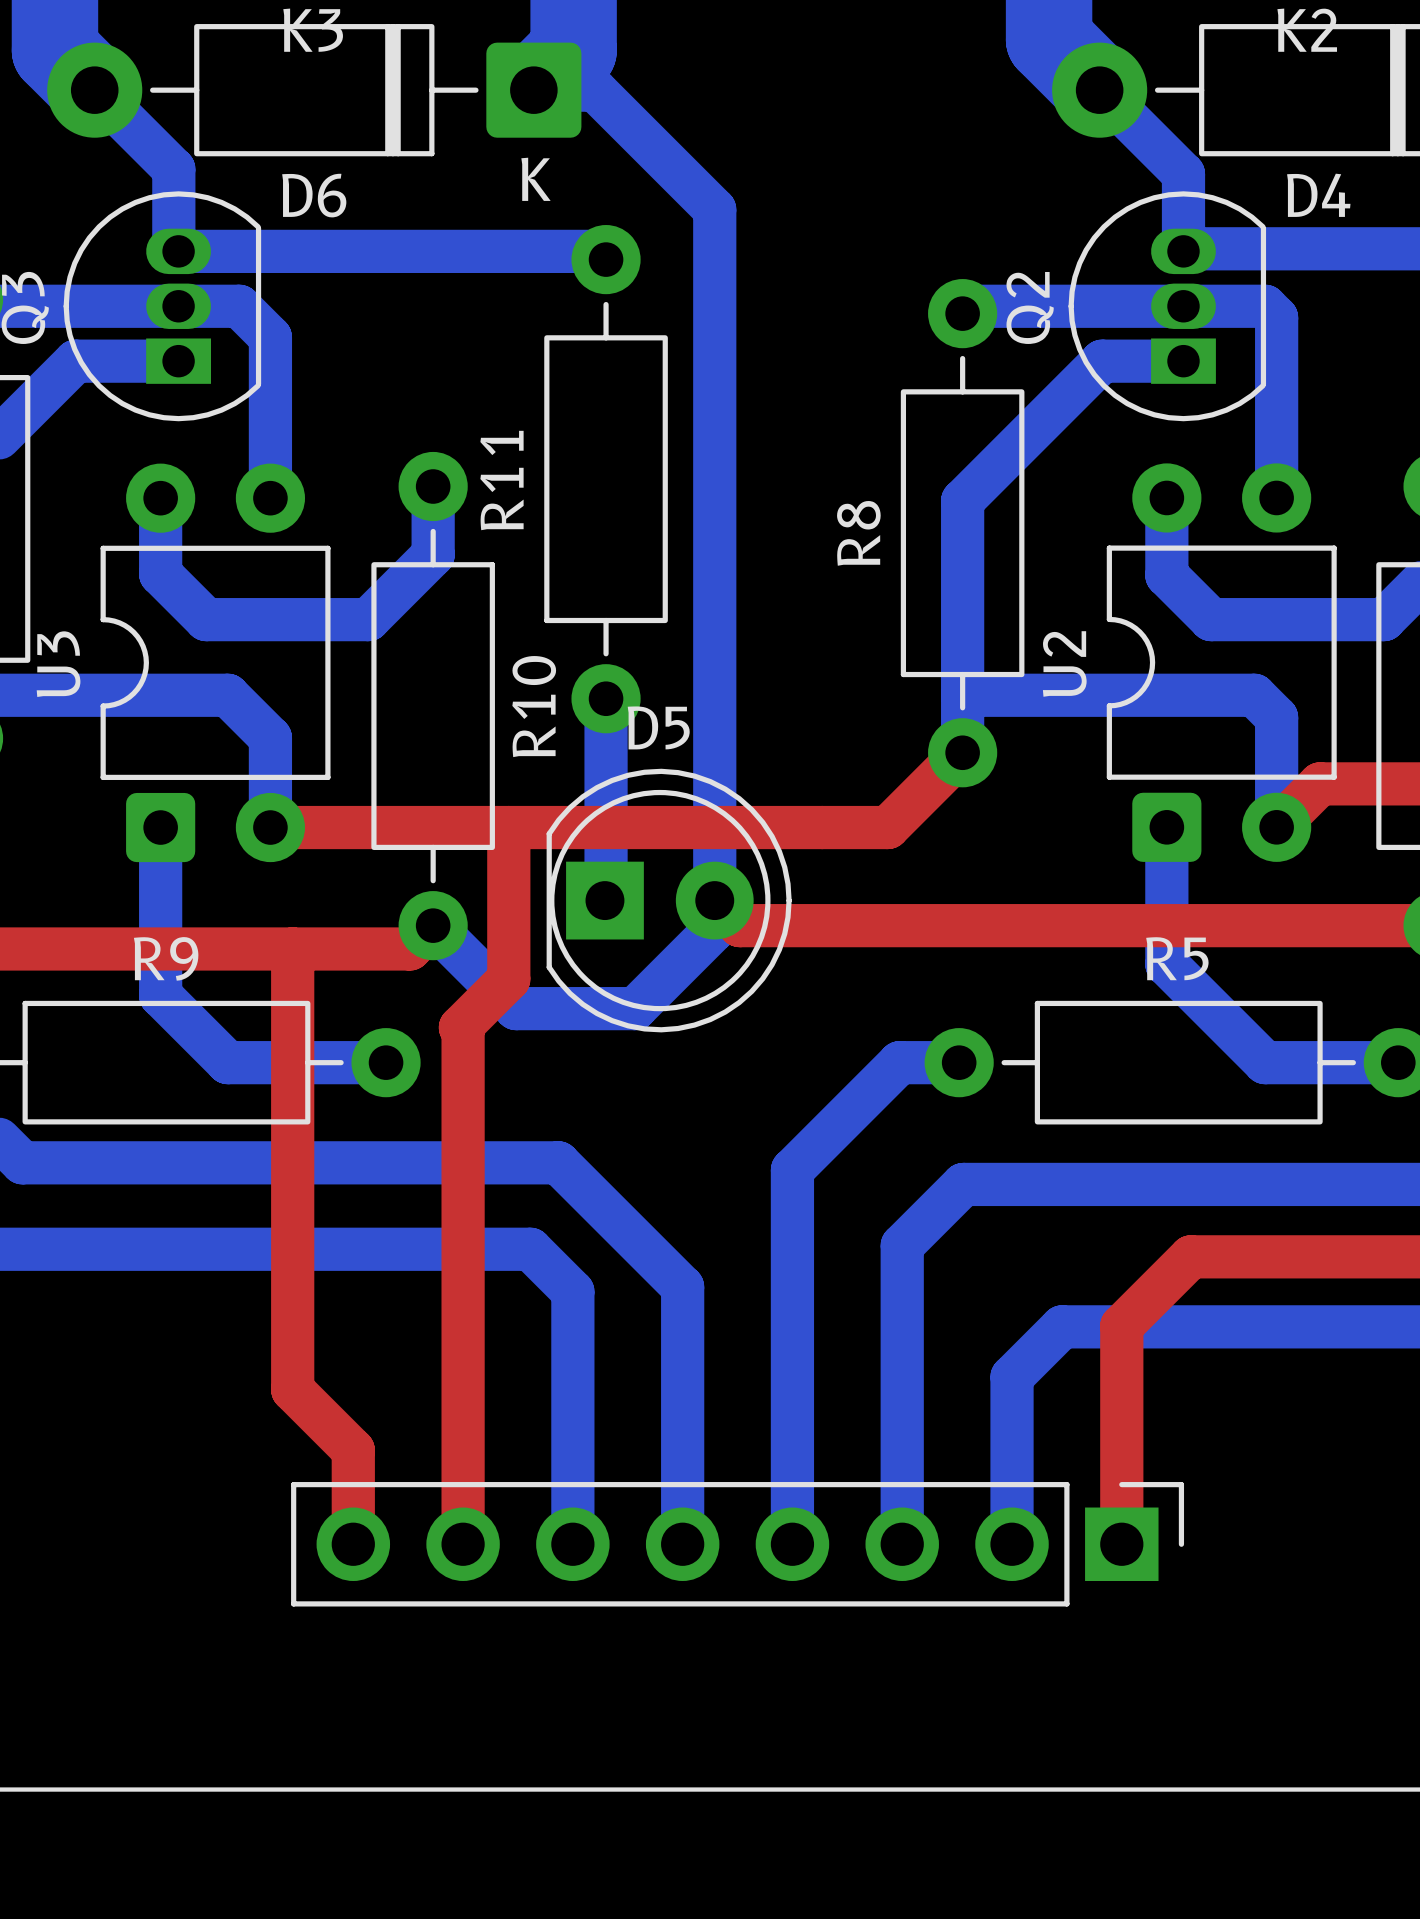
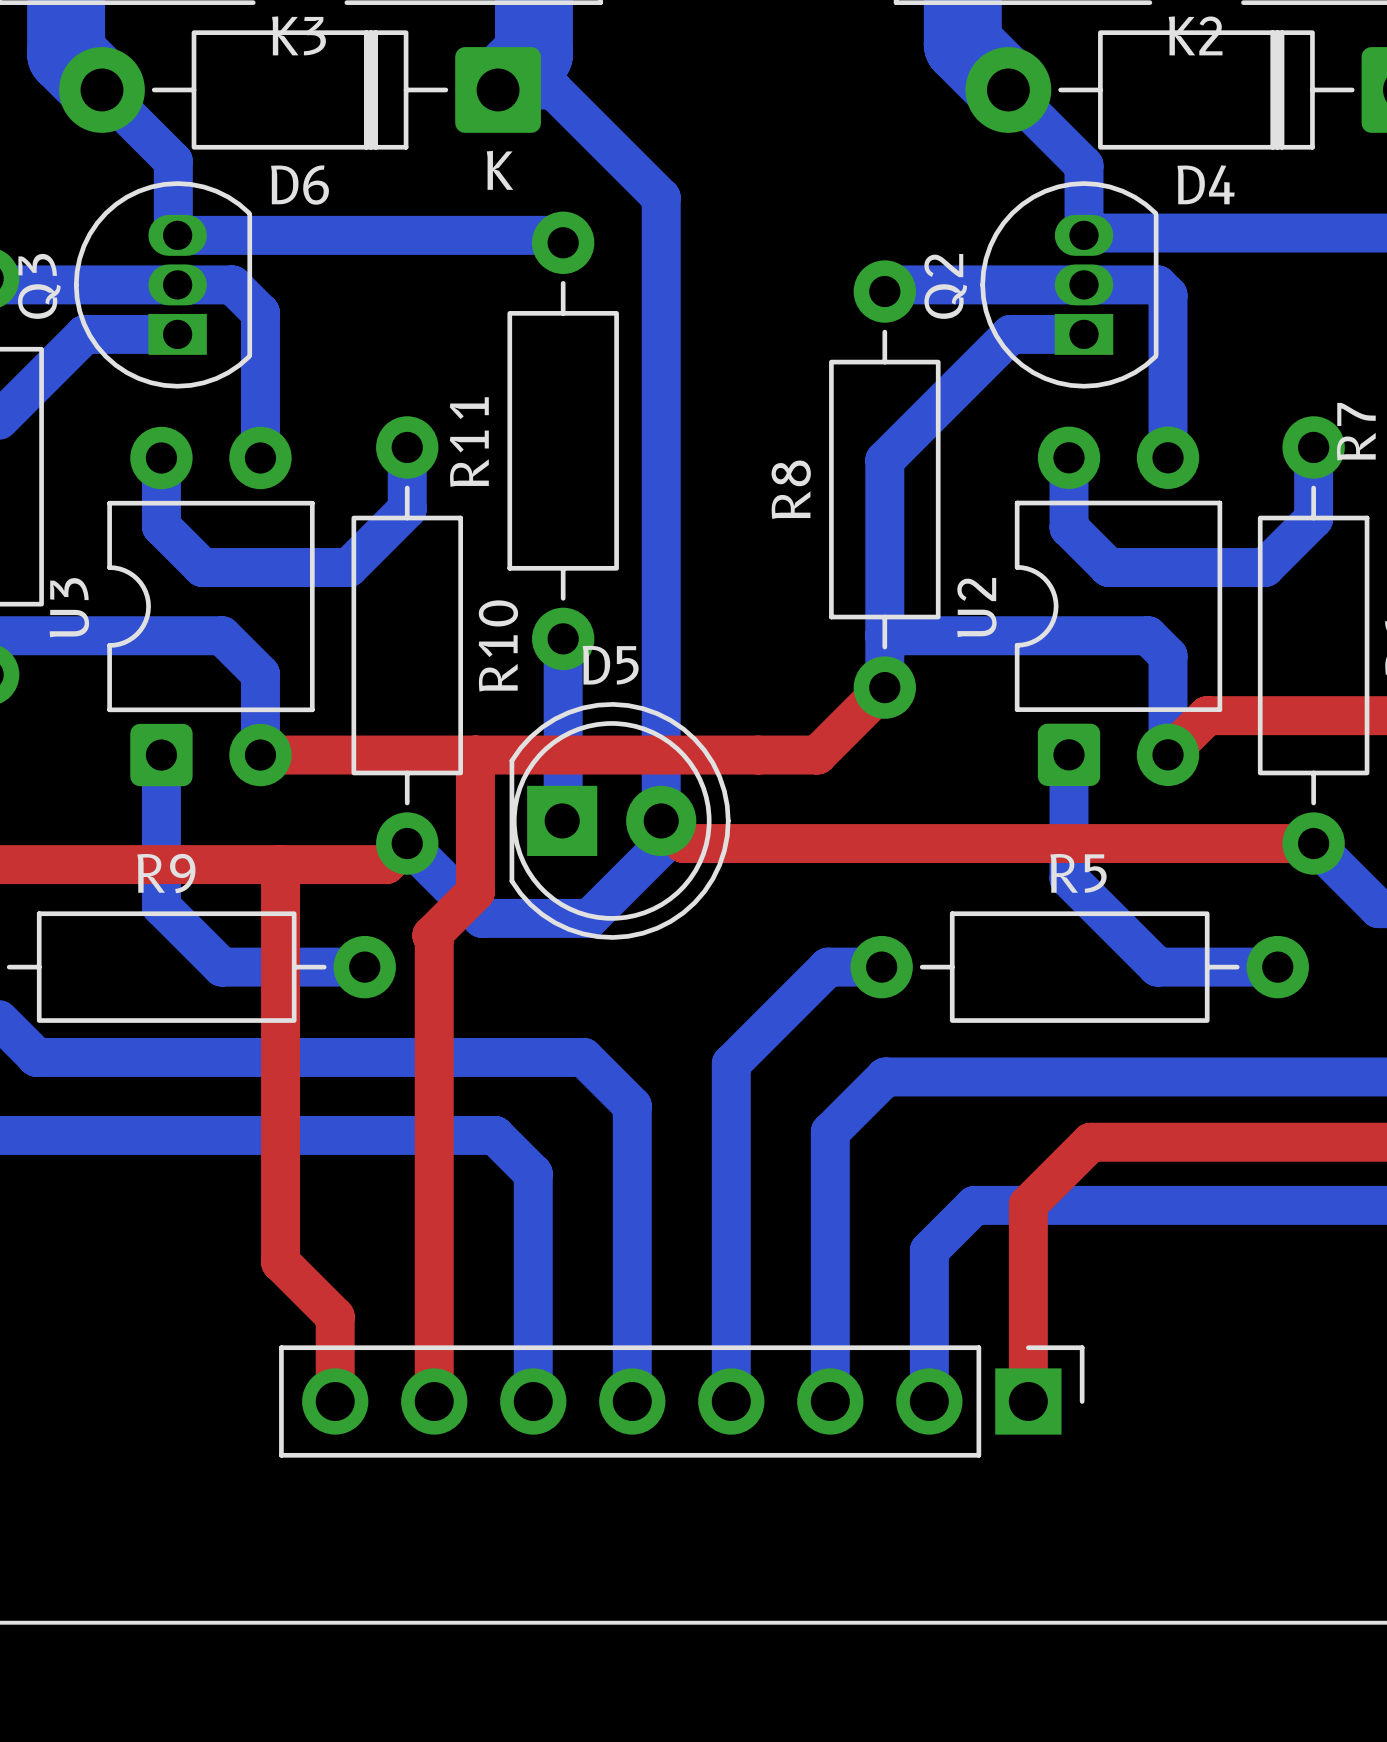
bottom track: (558, 1162) (682, 1287) -> (520, 1057) (583, 1057) (632, 1106) (632, 1169)

